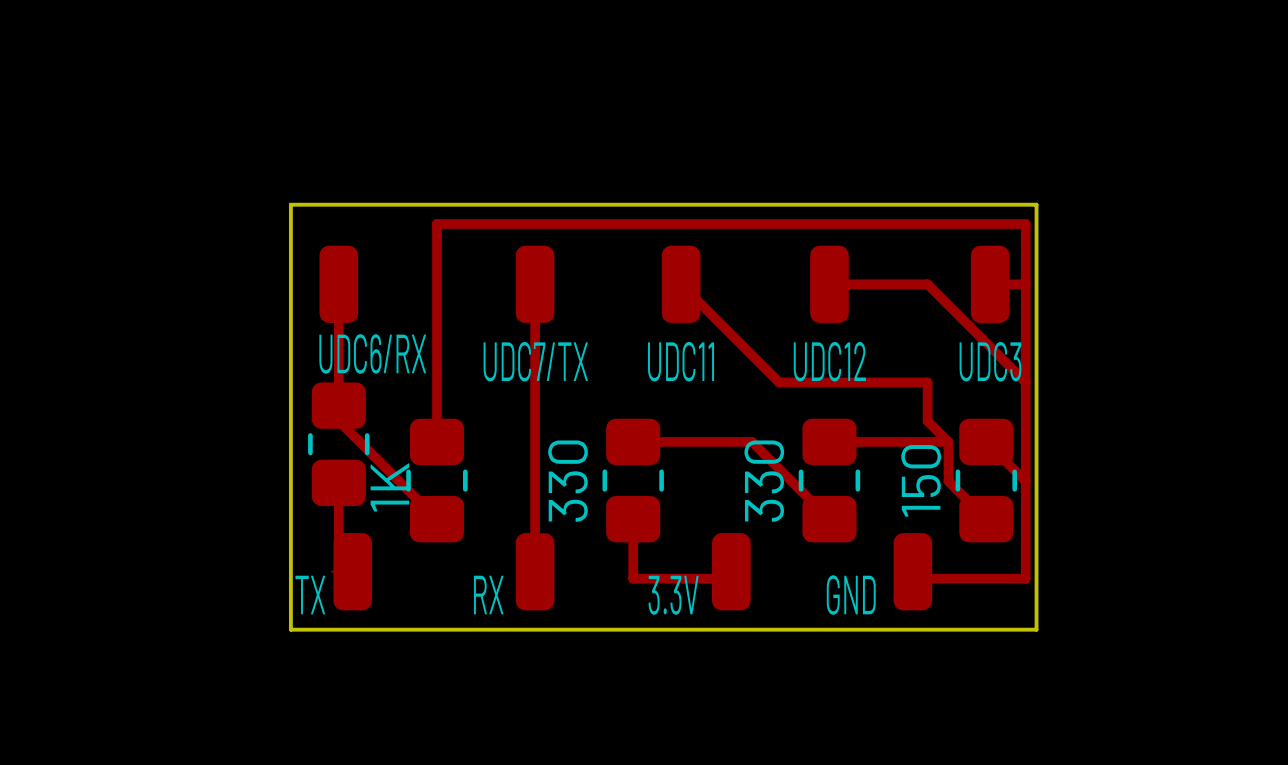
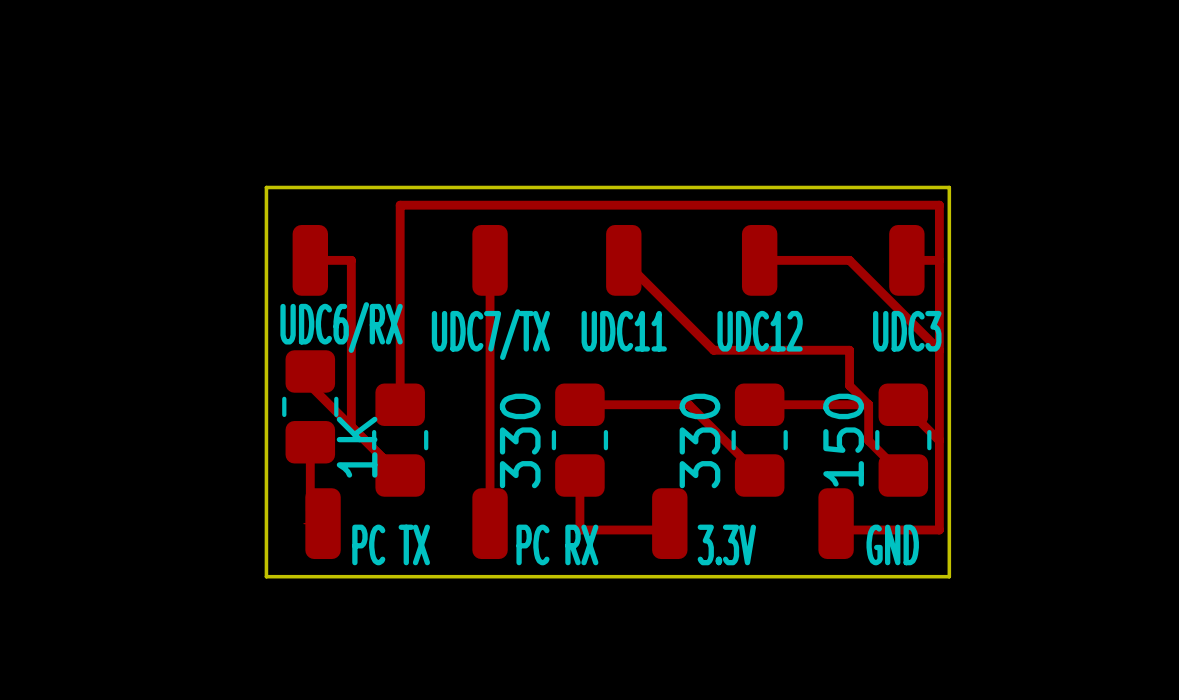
track: (338, 284) (338, 405) -> (310, 260) (351, 260) (351, 426)
TX name: TX (310, 595) -> PC TX (391, 544)
RX name: RX (488, 595) -> PC RX (557, 544)
3.3V name position: 3.3V (673, 595) -> 3.3V (726, 544)
GND name position: GND (851, 595) -> GND (892, 544)

